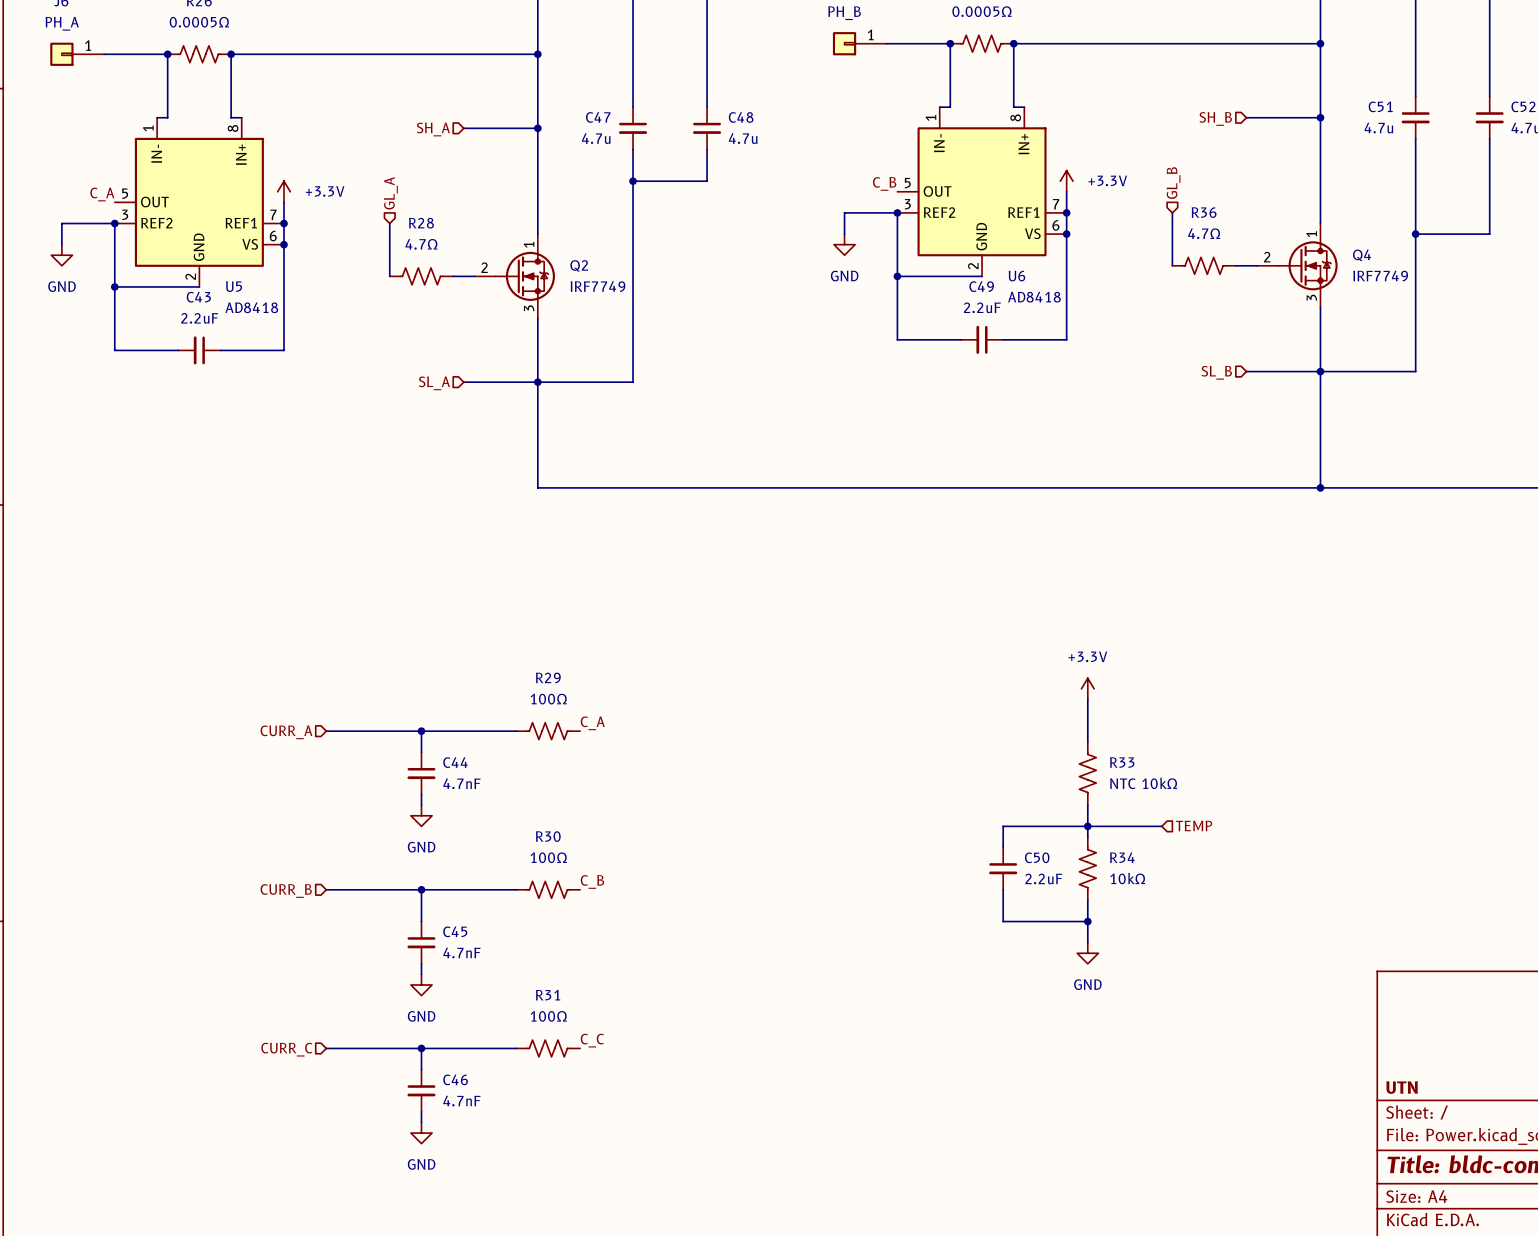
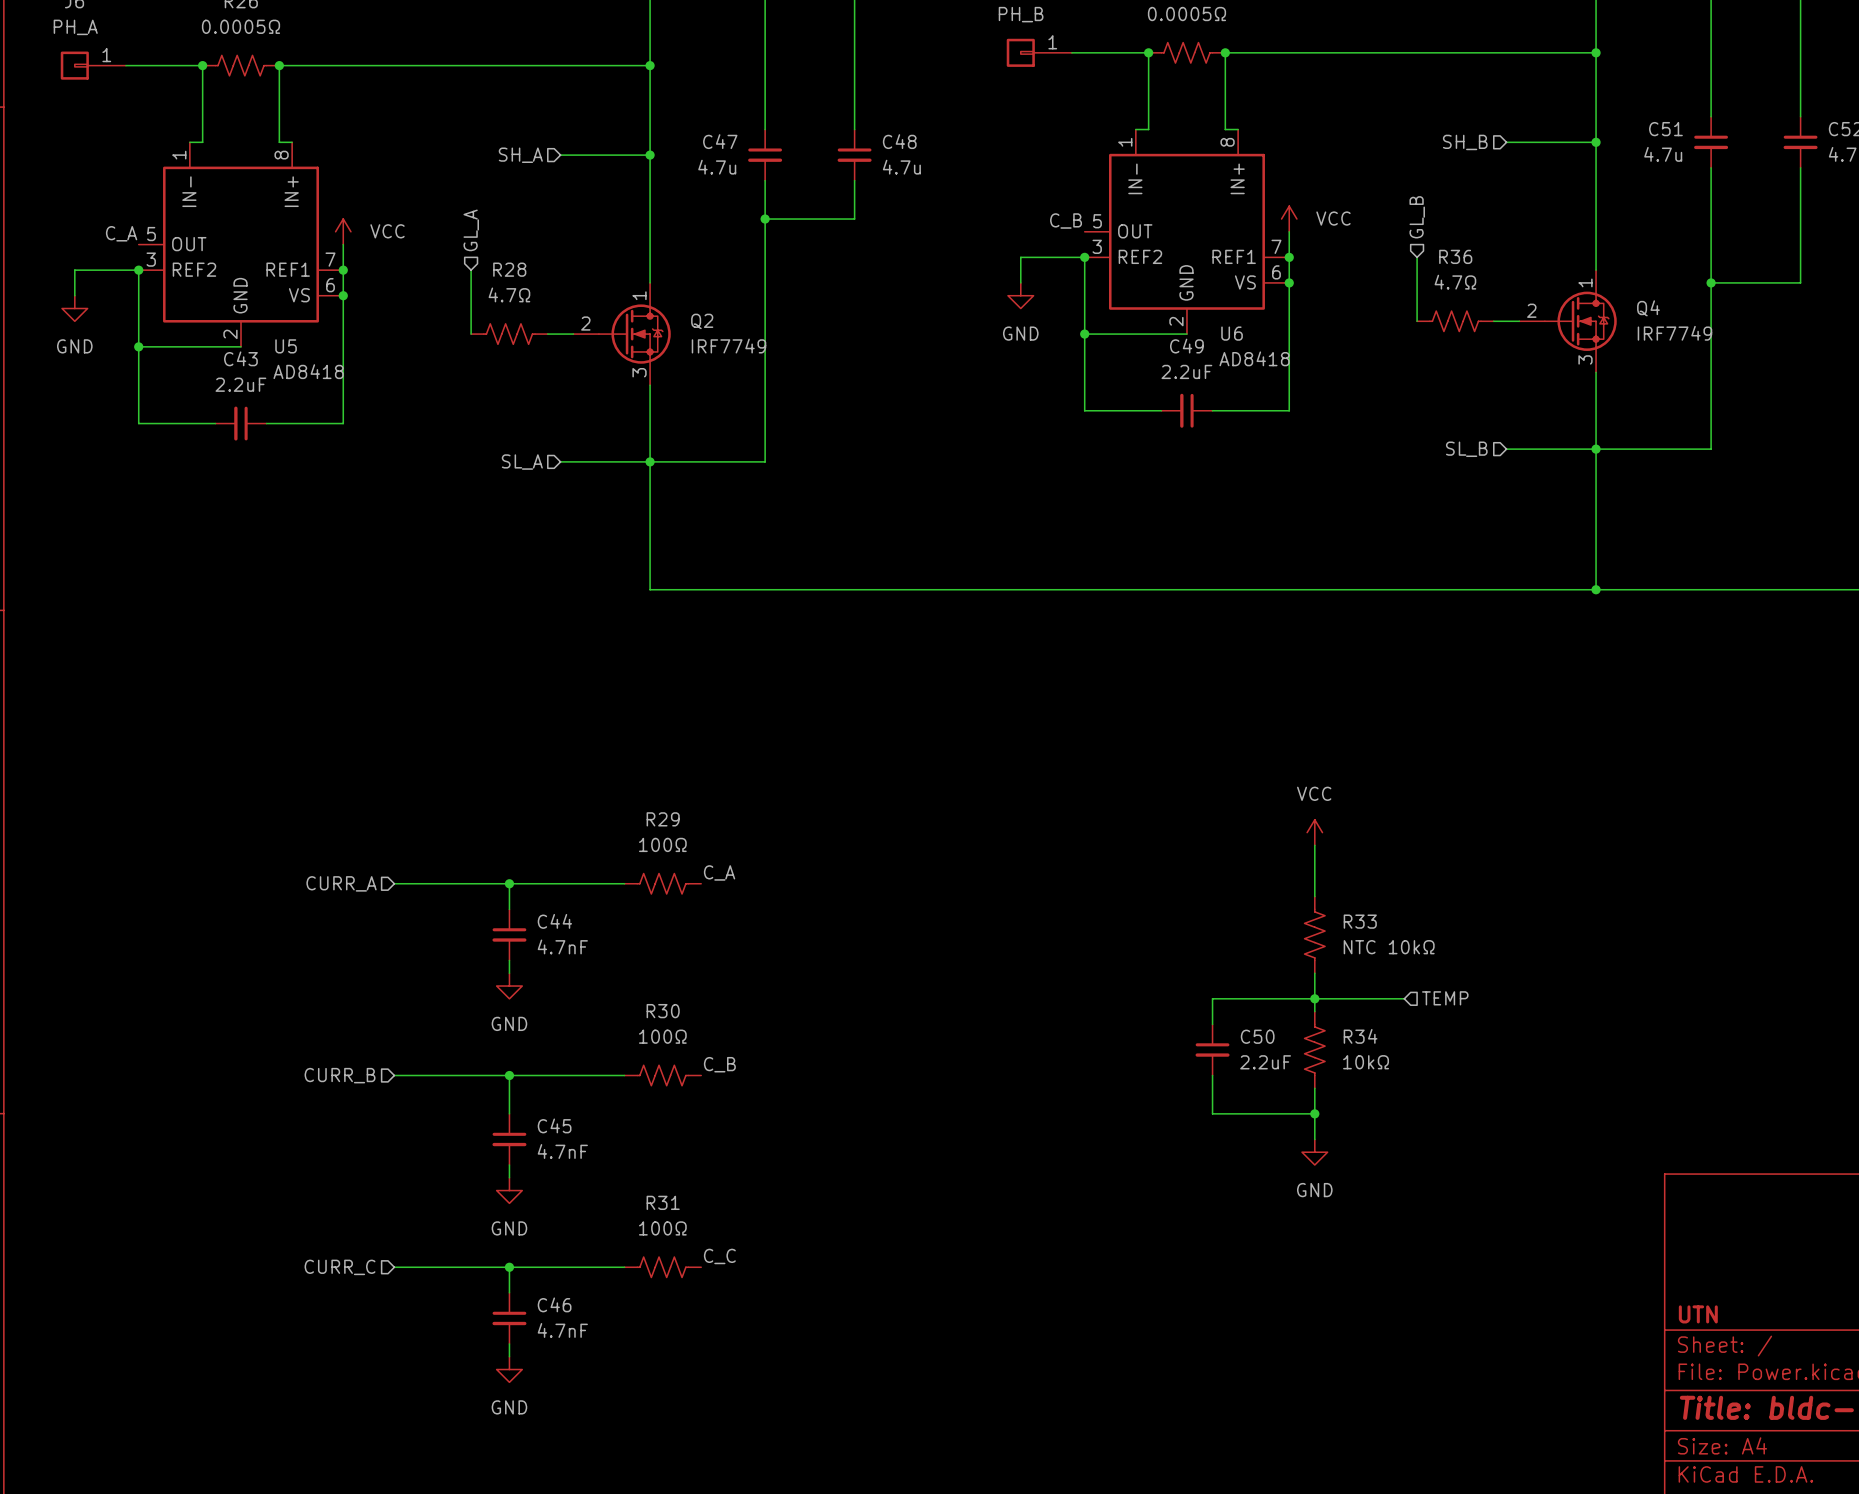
power symbol: +3.3V (1066, 181) -> VCC (1289, 219)
power symbol: +3.3V (284, 191) -> VCC (343, 231)
power symbol: +3.3V (1087, 688) -> VCC (1314, 832)

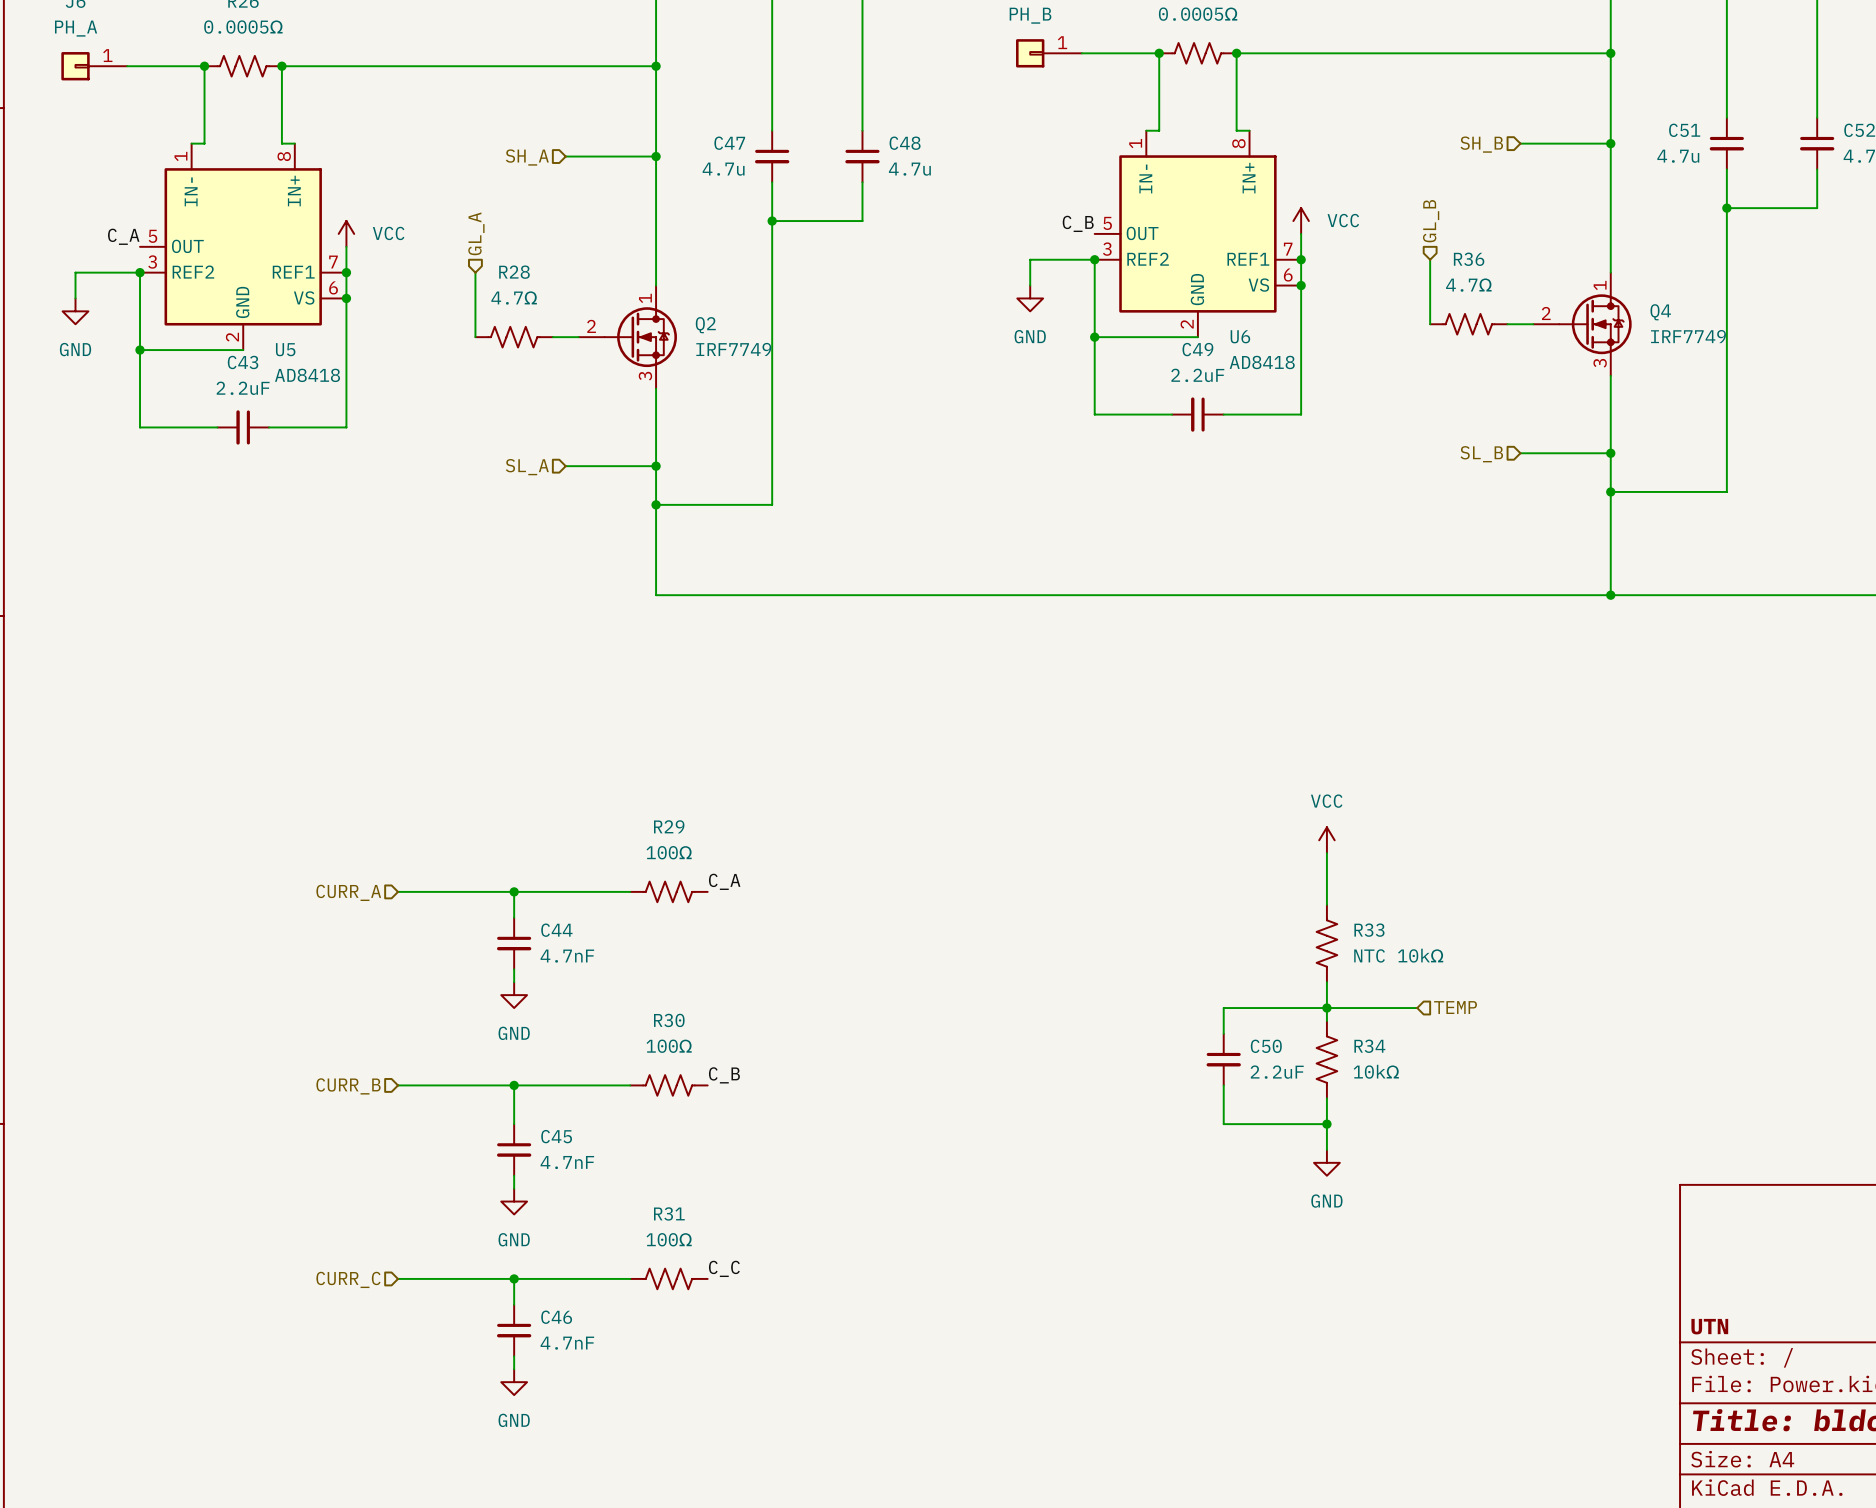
junction: none -> (1726, 208)
wire: (1800, 206) (1800, 282) (1711, 282) -> (1817, 208) (1726, 208)
junction: (1711, 282) -> none
wire: (1596, 449) (1711, 449) -> (1610, 491) (1726, 491) (1726, 453)
wire: (650, 461) (765, 461) -> (656, 504) (772, 504) (772, 466)
junction: none -> (1610, 491)
junction: none -> (656, 504)

